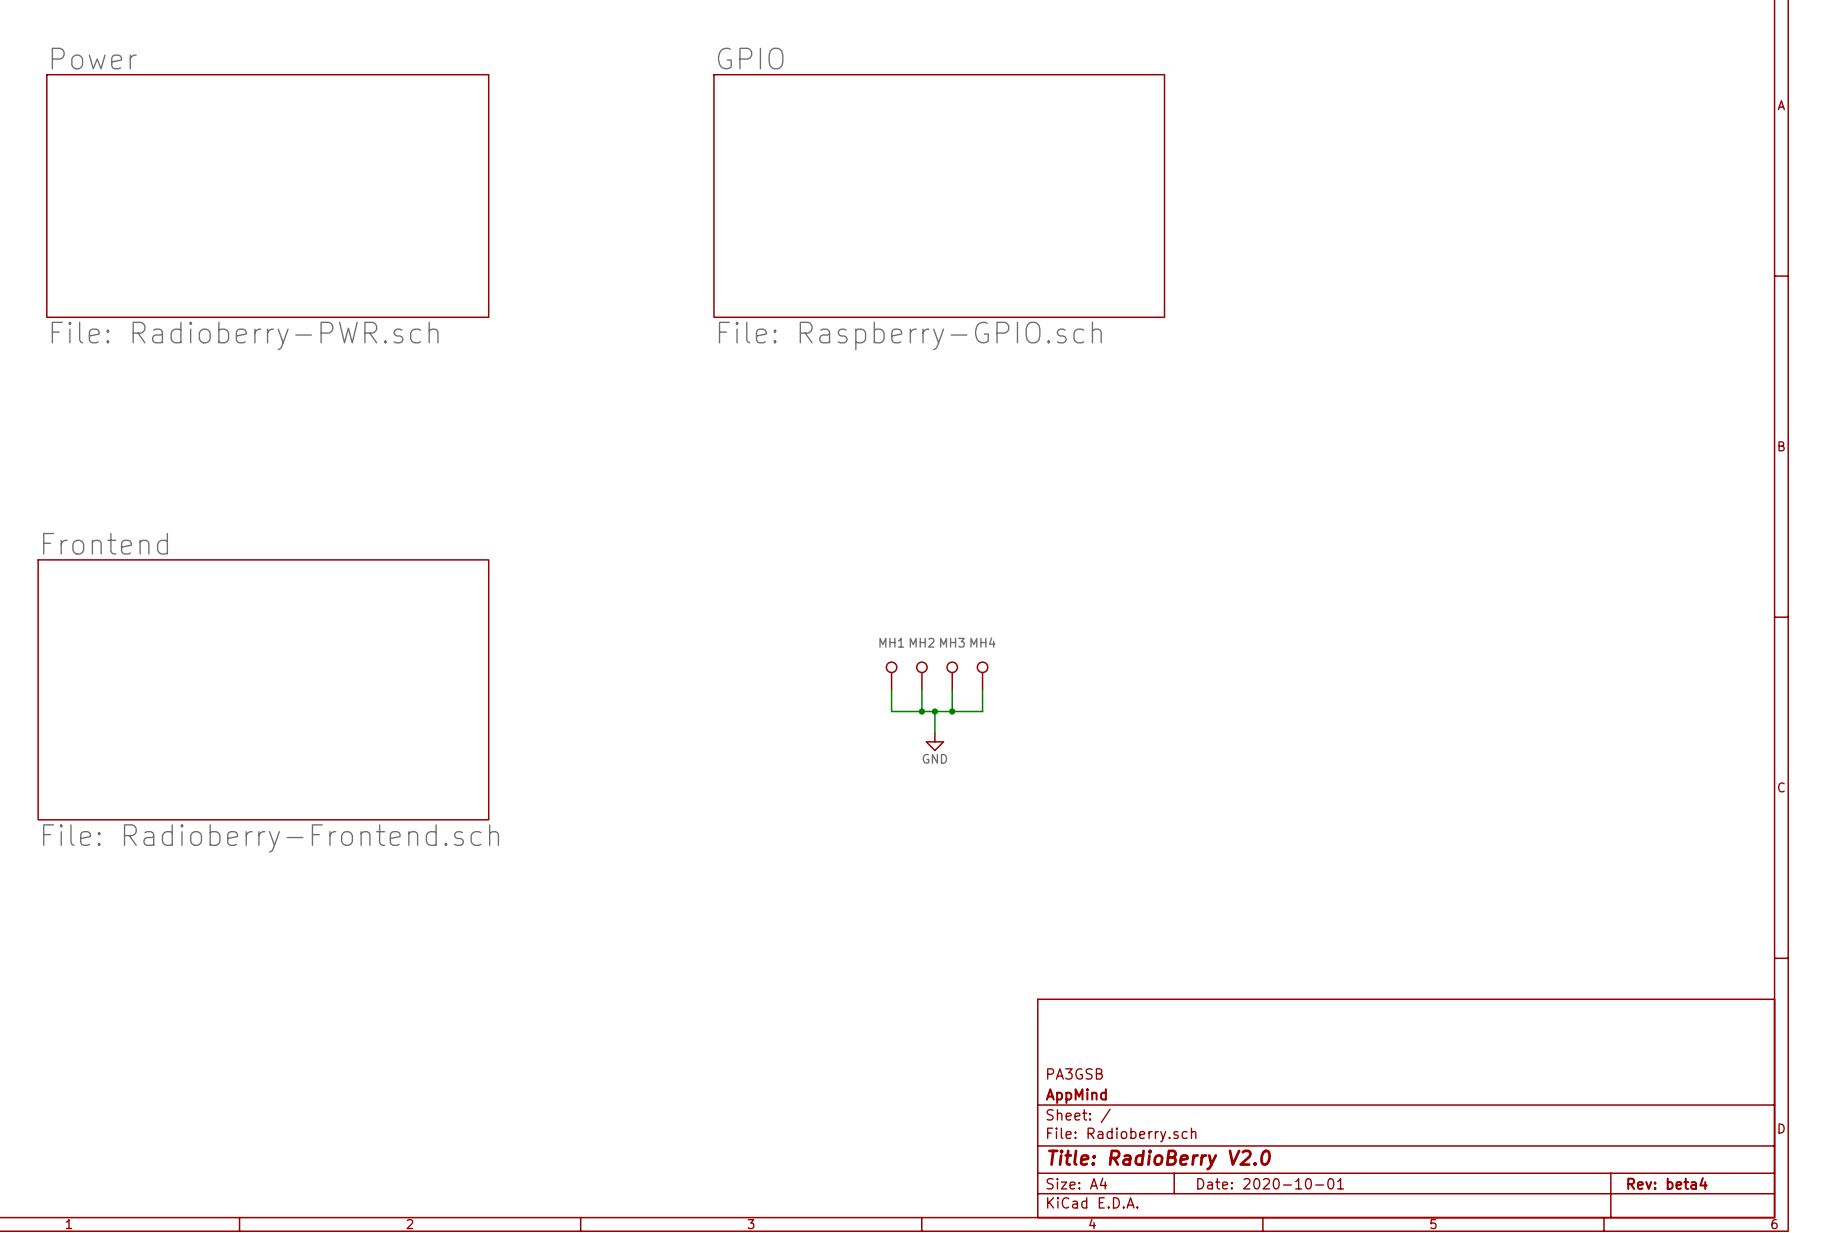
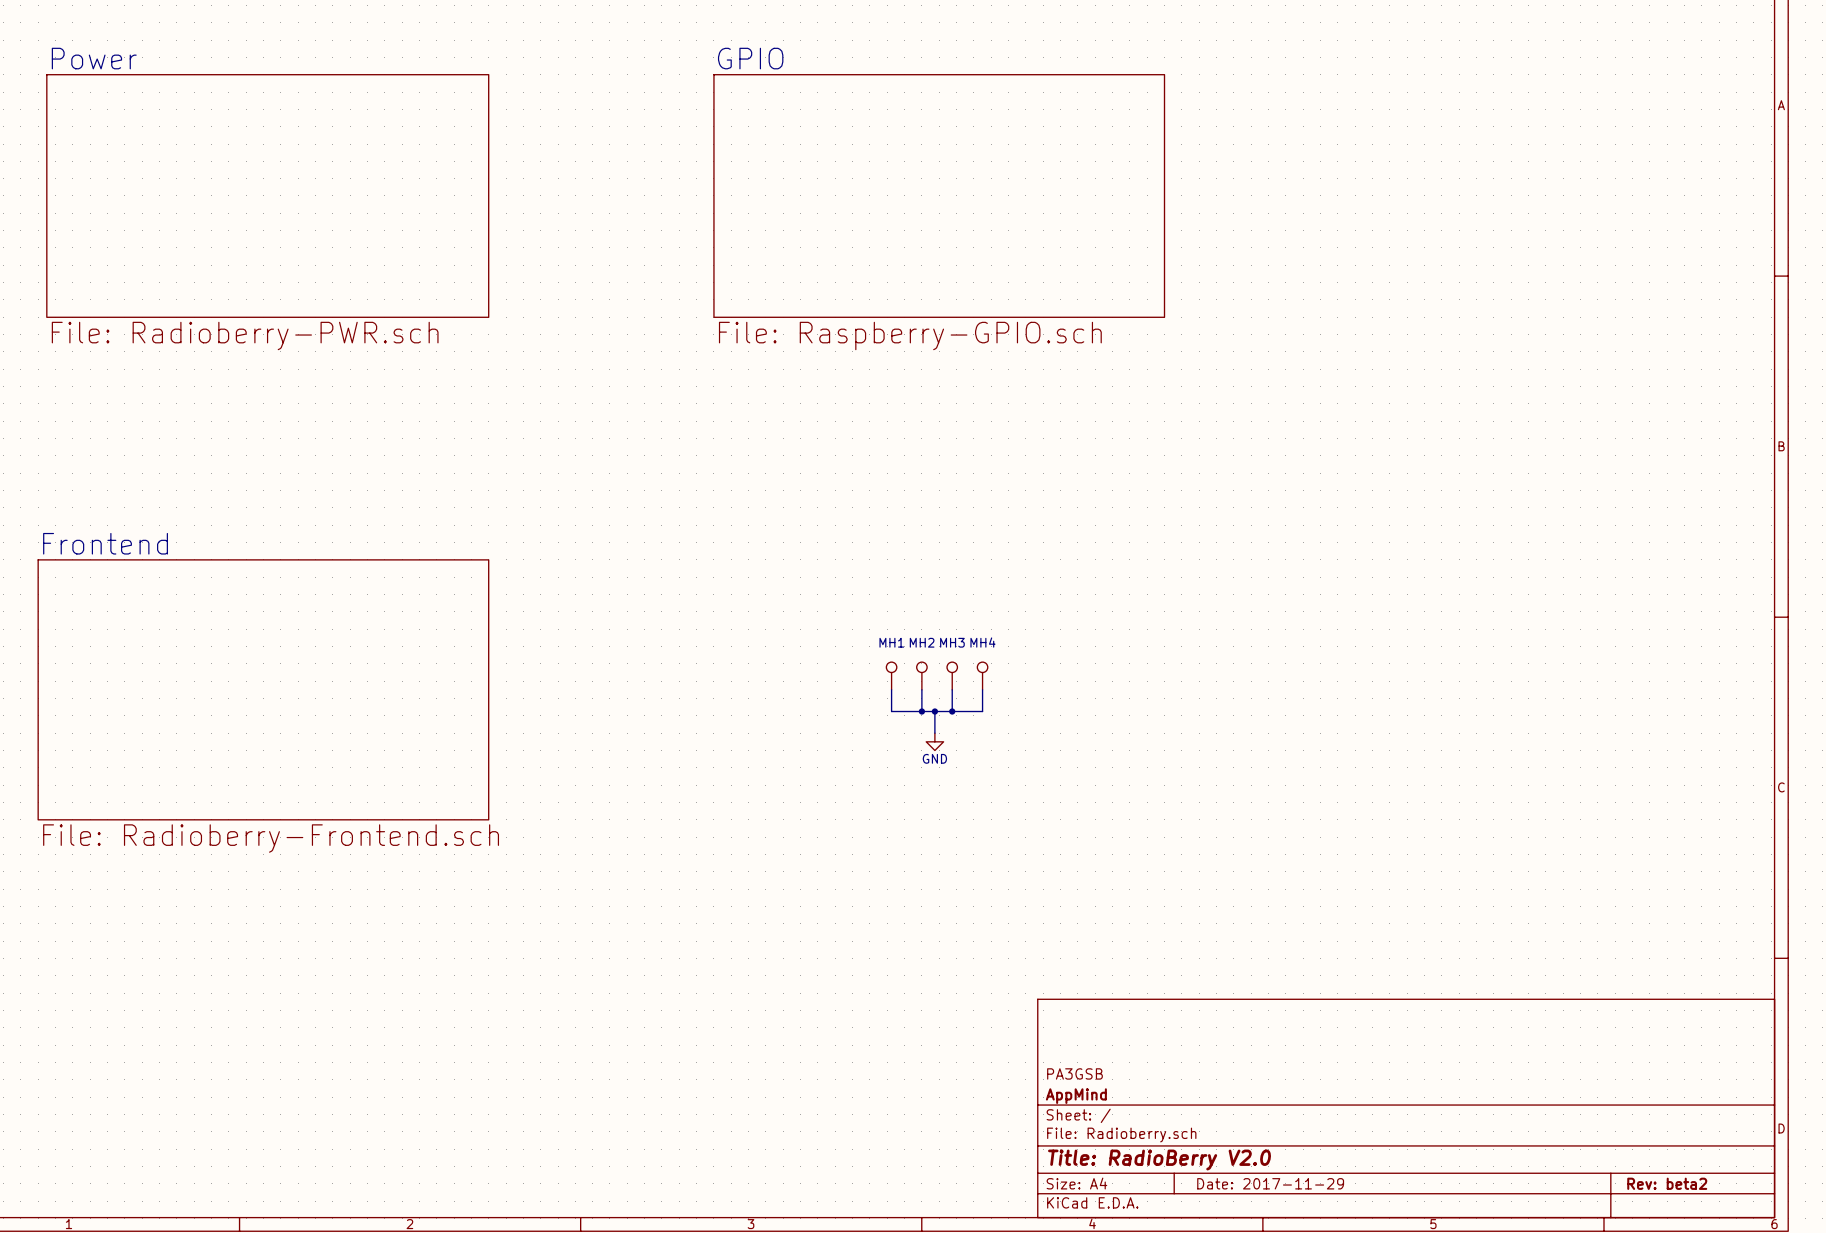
title block: Date: 2020-10-01 (1270, 1183) -> Date: 2017-11-29 (1270, 1183)
title block: Rev: beta4 (1667, 1183) -> Rev: beta2 (1667, 1183)

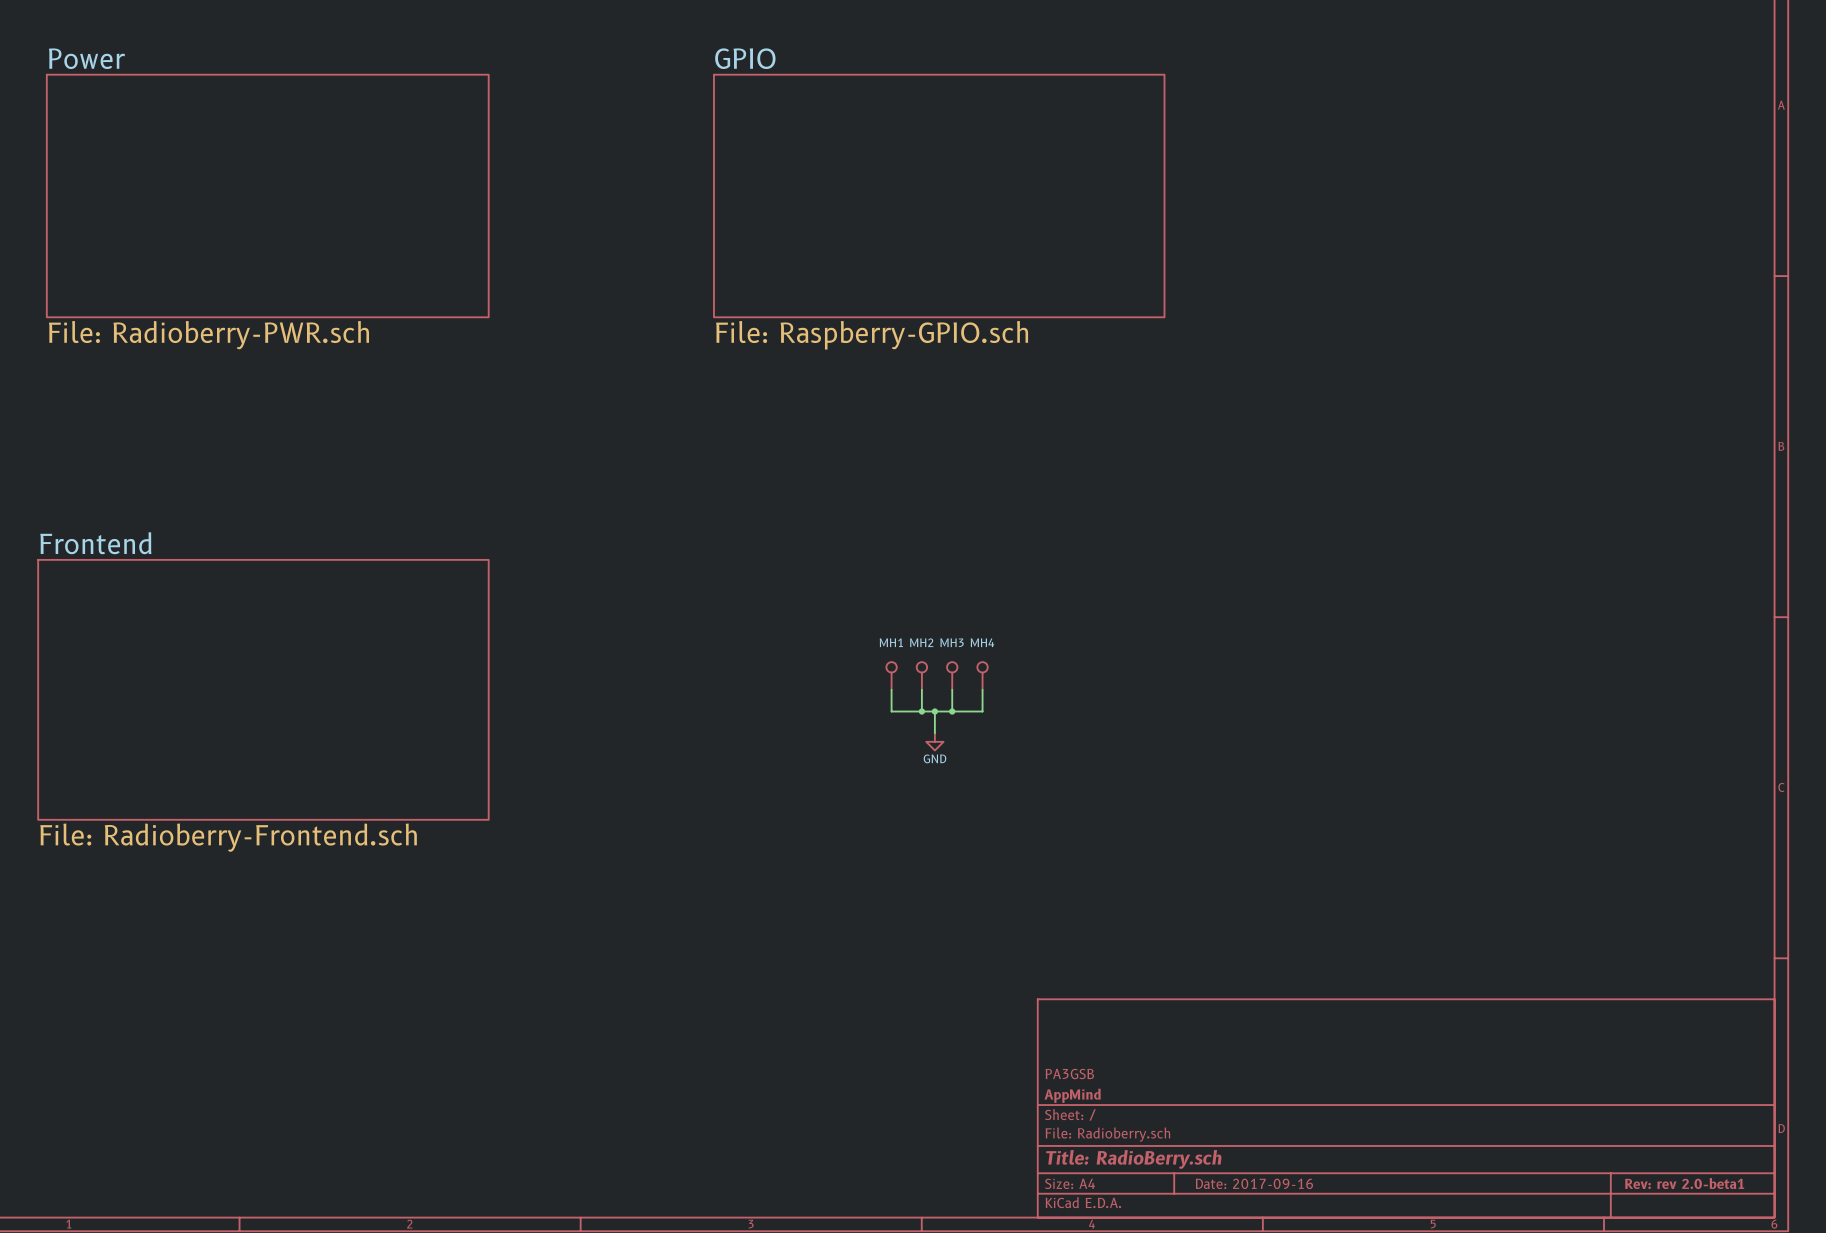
title block: Title: RadioBerry V2.0 (1159, 1160) -> Title: RadioBerry.sch (1133, 1159)
title block: Date: 2017-11-29 (1270, 1183) -> Date: 2017-09-16 (1254, 1183)
title block: Rev: beta2 (1667, 1183) -> Rev: rev 2.0-beta1 (1684, 1183)

